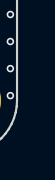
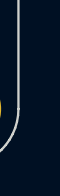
via: (10, 14) -> none
via: (10, 41) -> none
via: (10, 68) -> none
via: (10, 95) -> none

